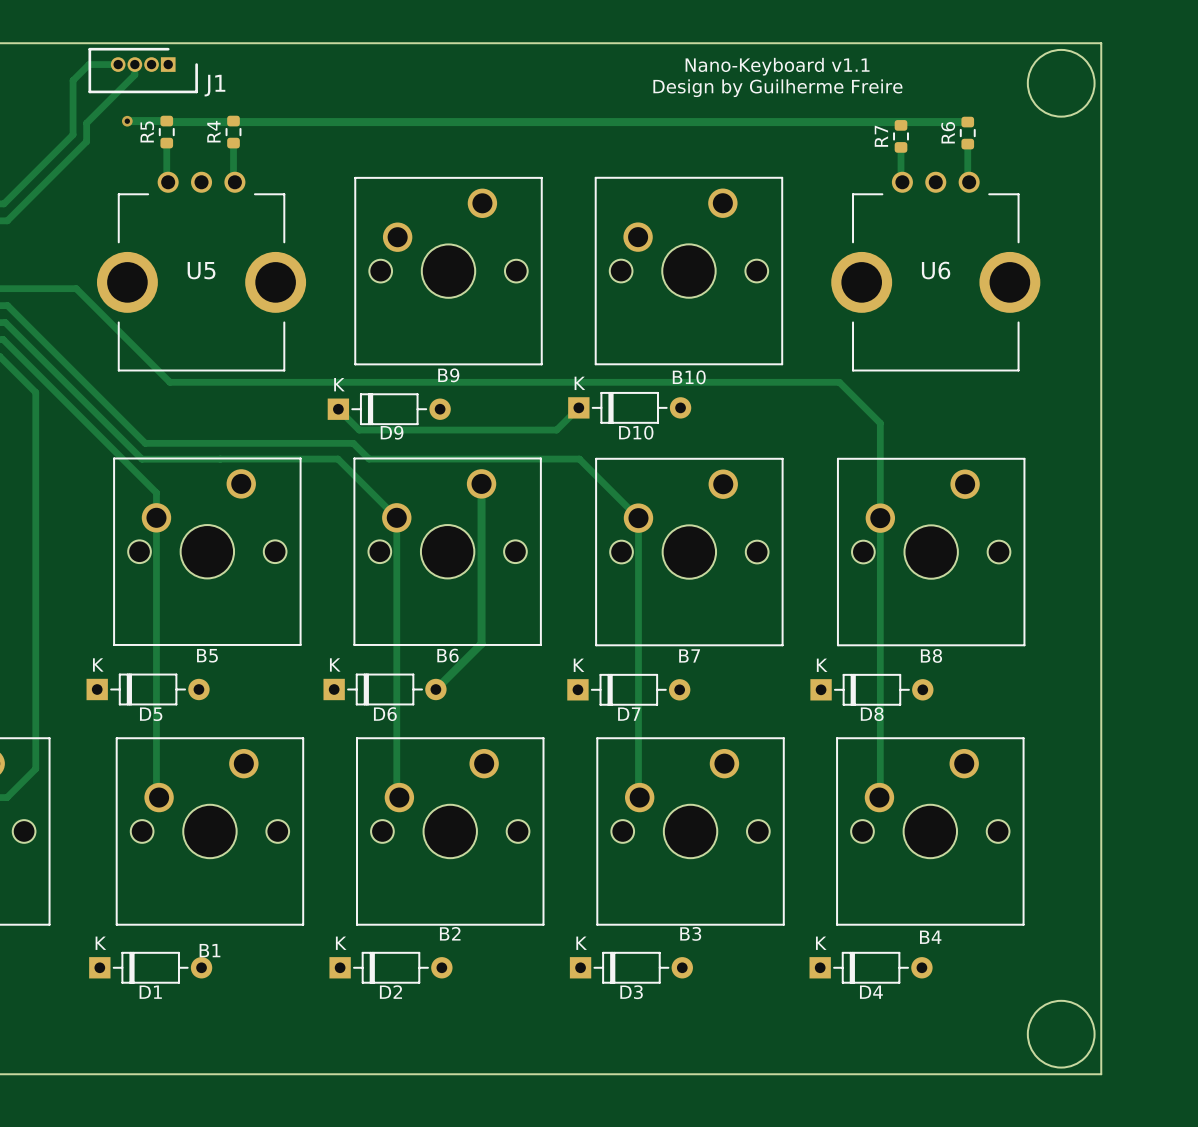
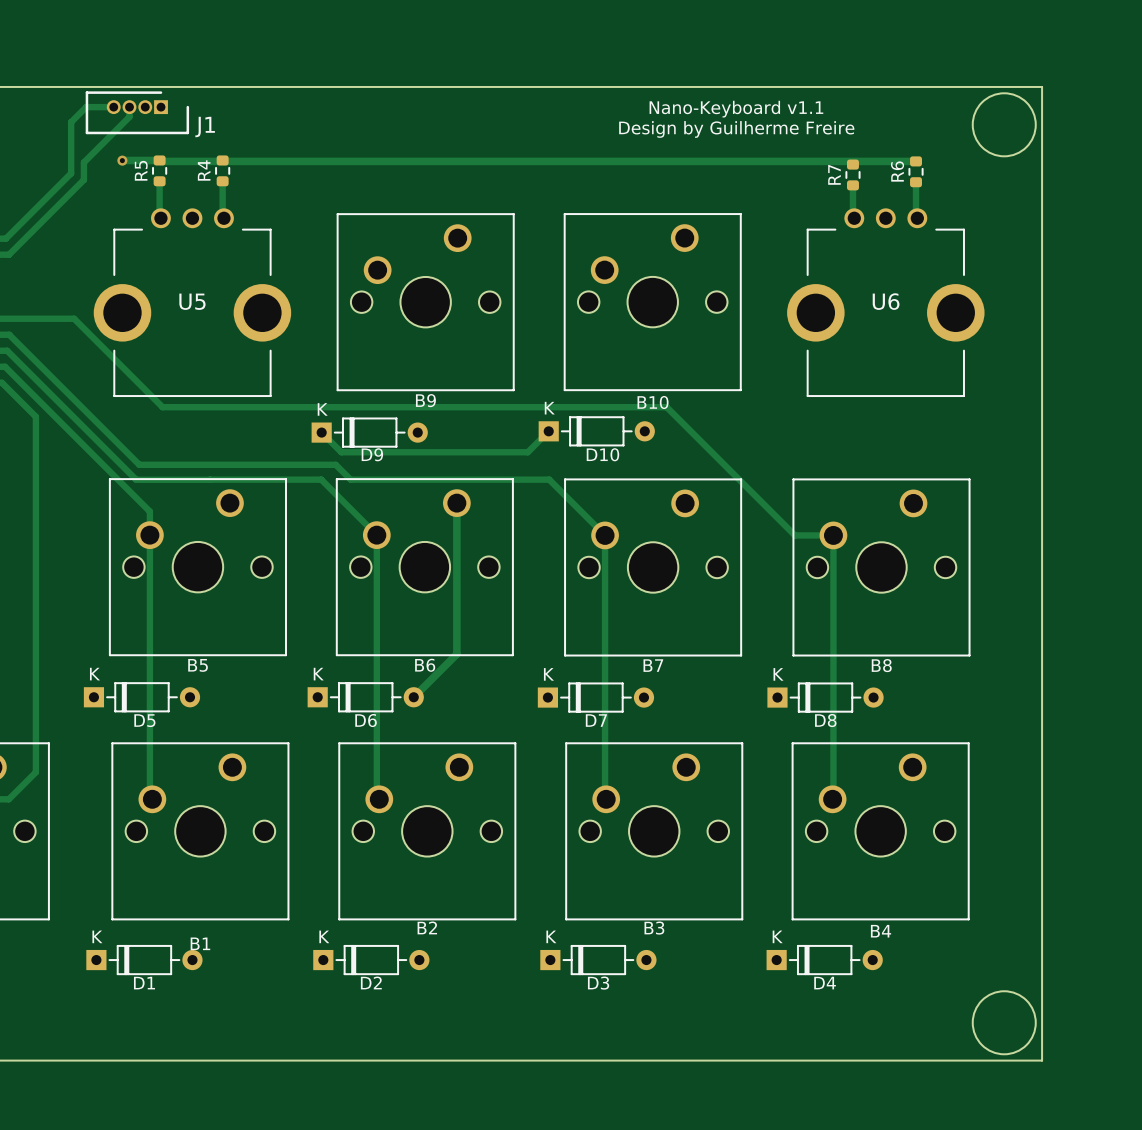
track: (703, 382) (839, 382) (880, 423) (880, 518) -> (666, 407) (794, 535) (833, 535)

